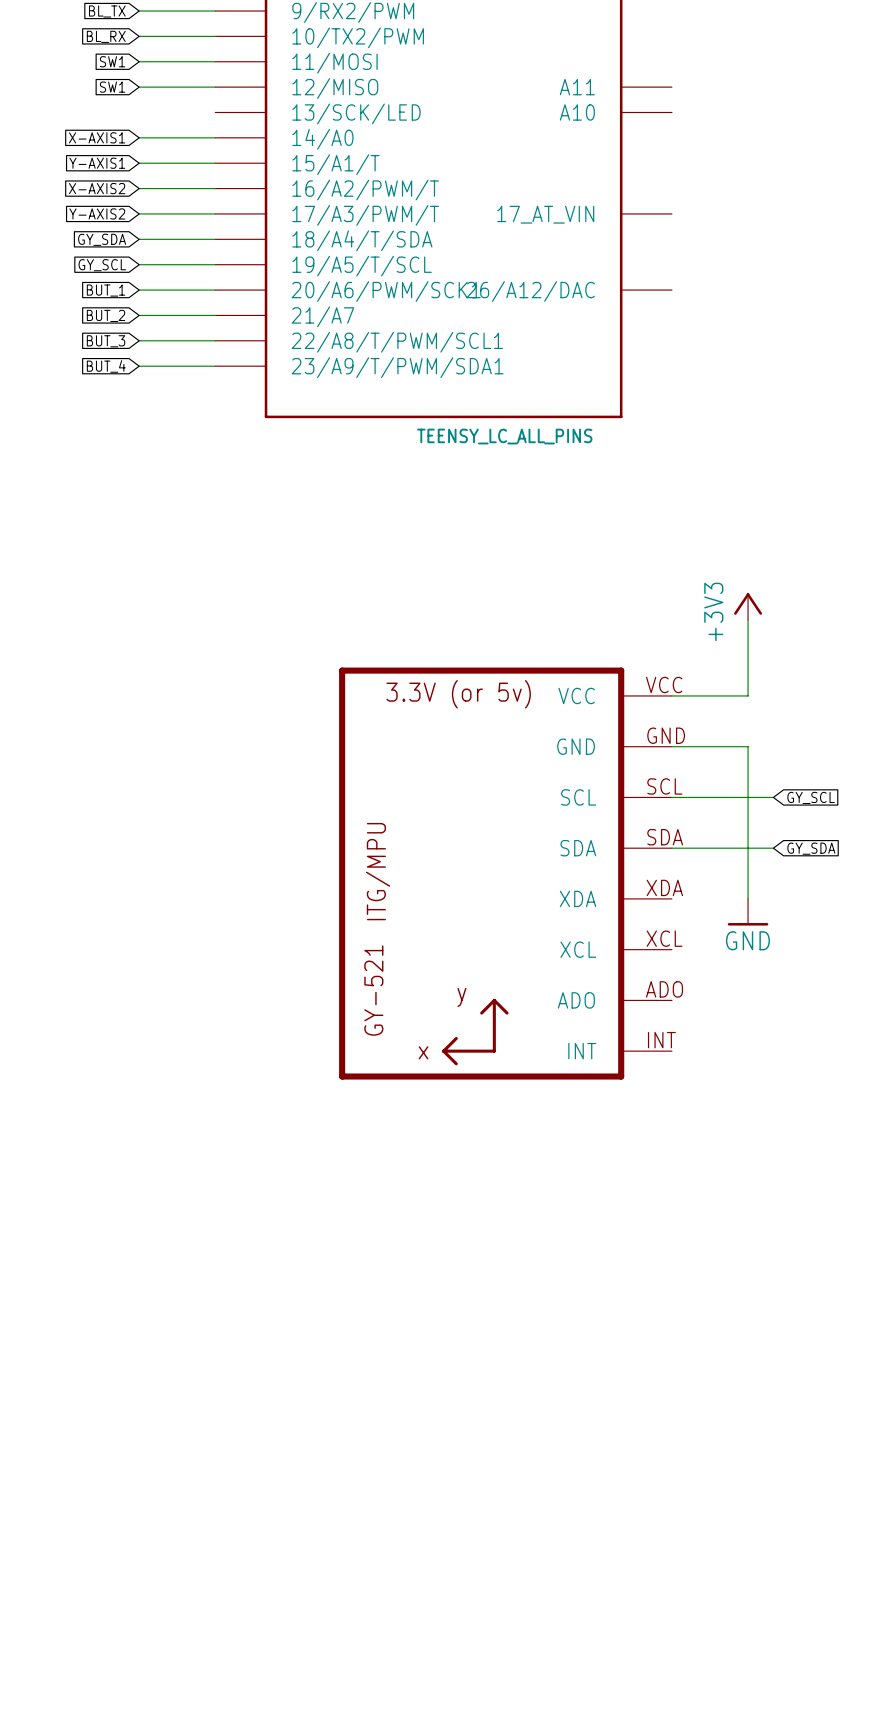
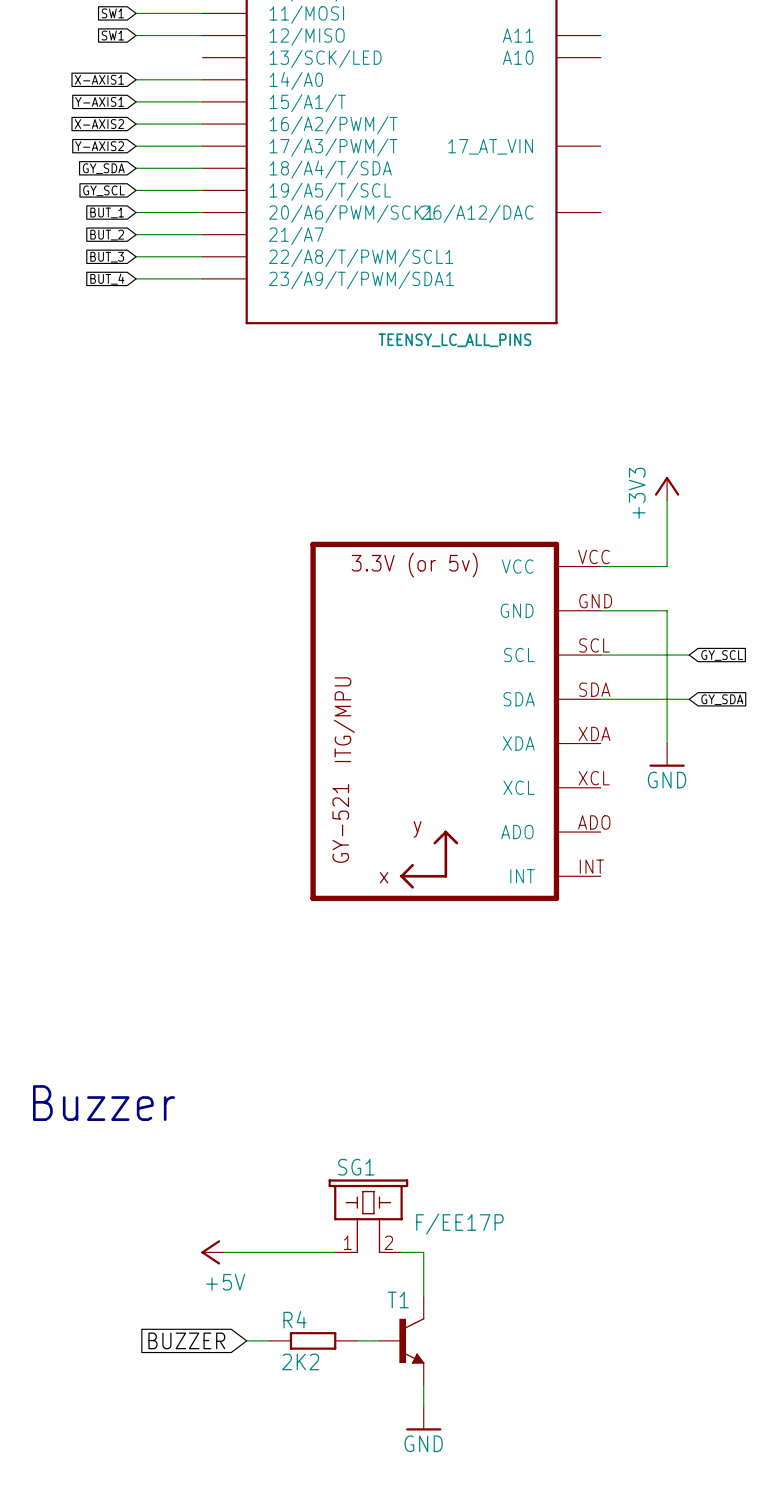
text: none -> Buzzer (104, 1103)
SG1: none -> F/EE17P (368, 1216)
power symbol: none -> +5V (212, 1252)
wire: none -> (224, 1252) (335, 1252)
wire: none -> (401, 1252) (423, 1252) (423, 1296)
global label: none -> BUZZER (186, 1340)
wire: none -> (246, 1340) (268, 1340)
R4: none -> 2K2 (313, 1340)
wire: none -> (357, 1340) (379, 1340)
T1: none -> (401, 1340)
wire: none -> (423, 1385) (423, 1407)
power symbol: none -> GND (423, 1418)

